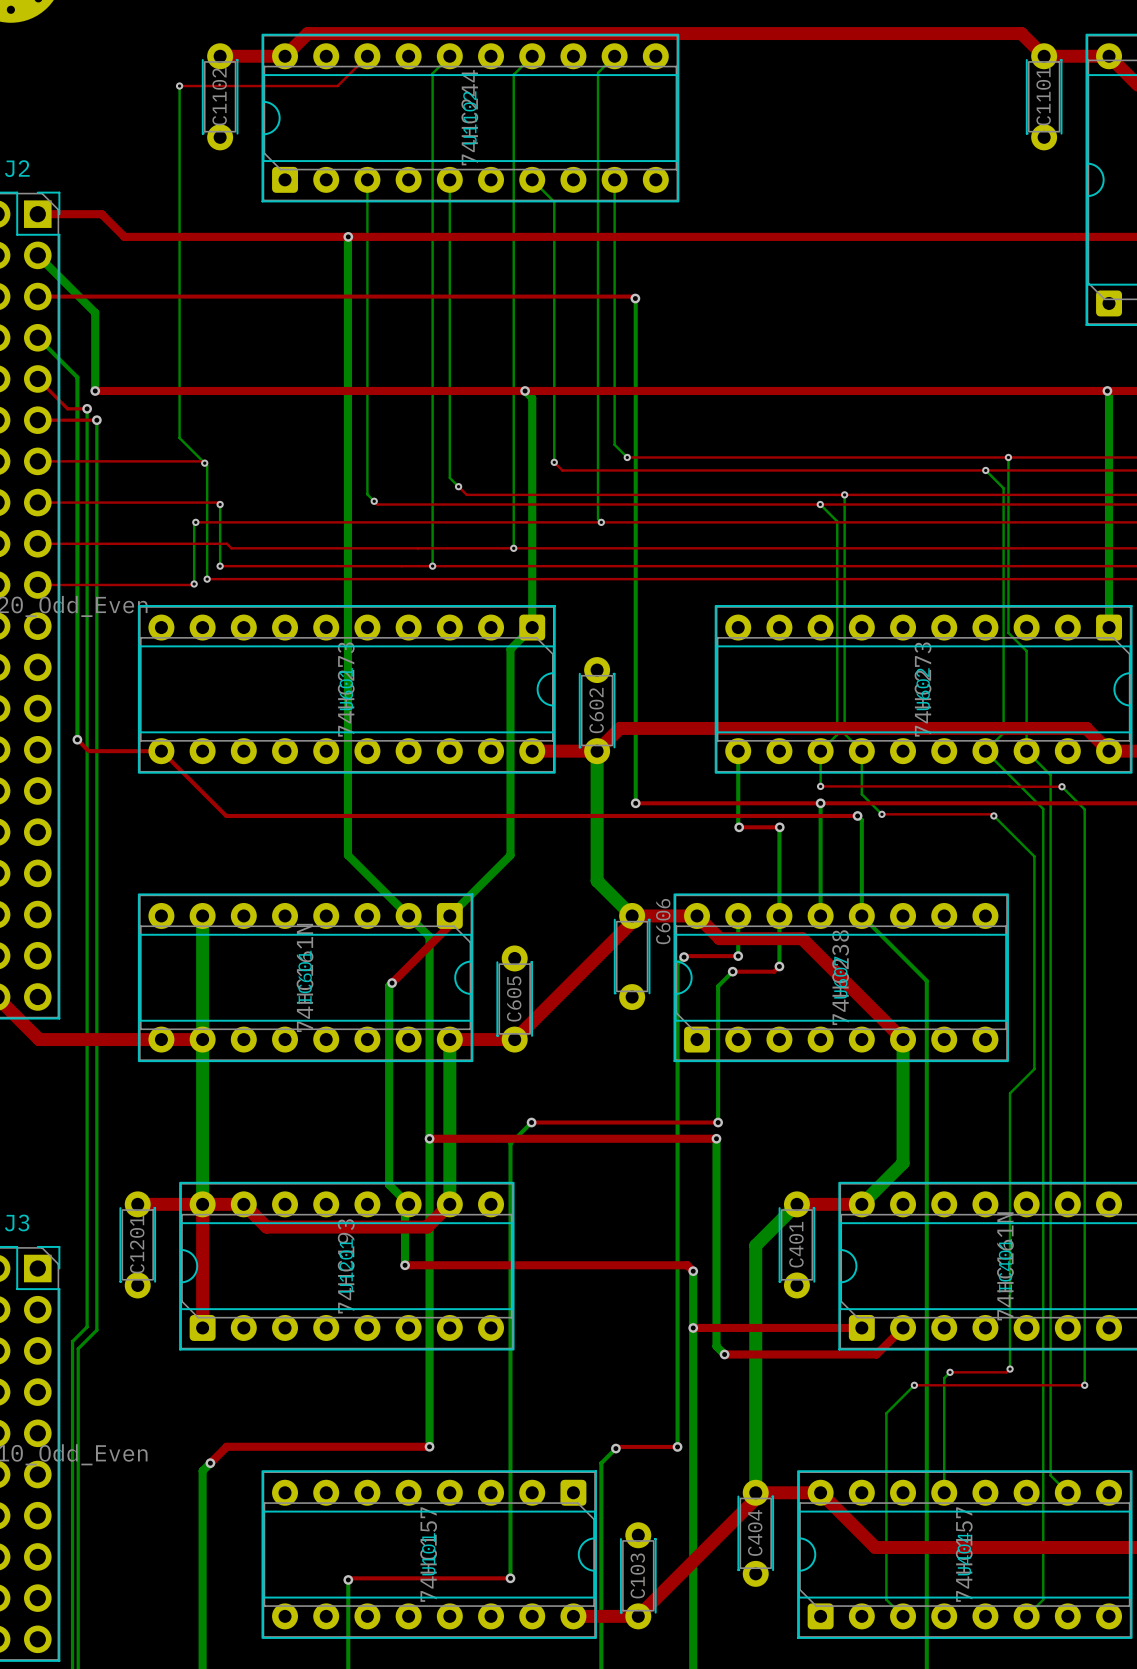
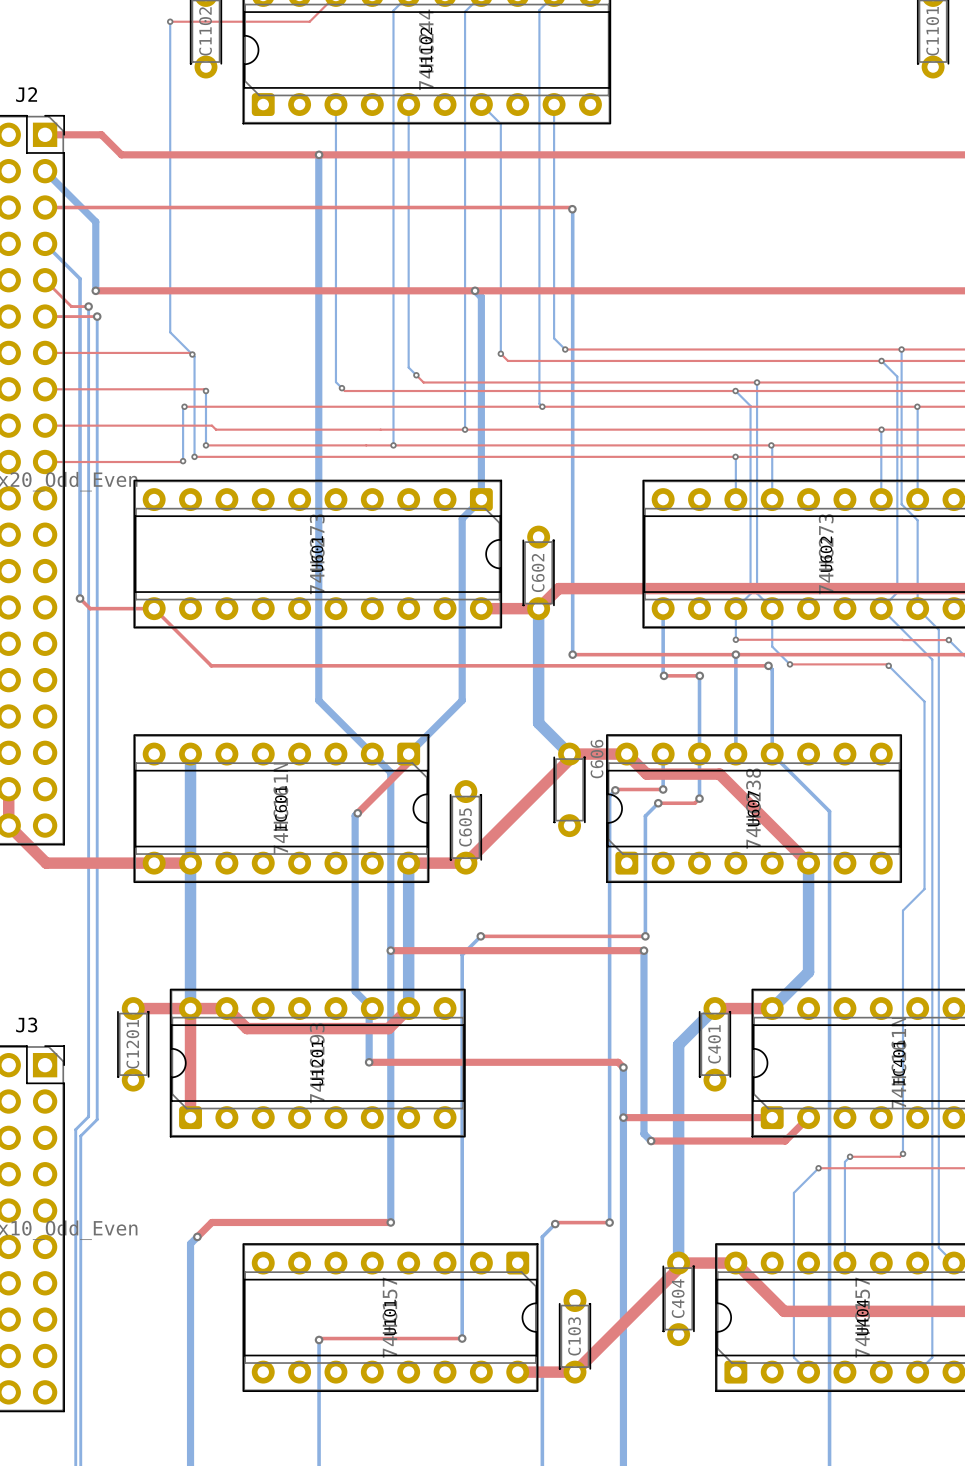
bottom track: none -> (917, 406) (917, 499)
via: none -> (917, 406)
bottom track: none -> (881, 429) (881, 499)
via: none -> (881, 429)
bottom track: none -> (771, 445) (772, 499)
via: none -> (771, 445)
bottom track: none -> (735, 456) (735, 499)
via: none -> (735, 456)

